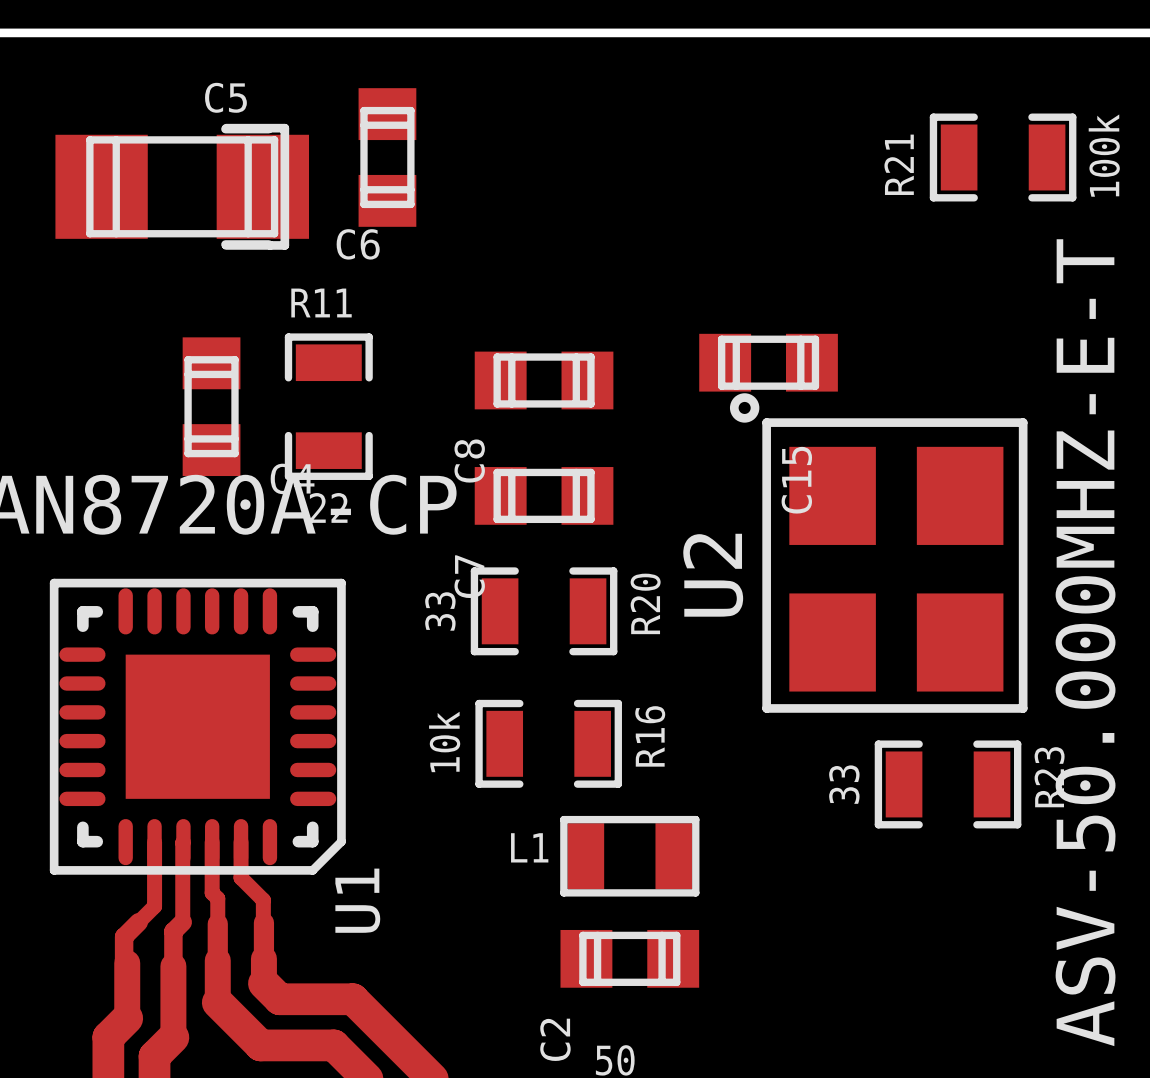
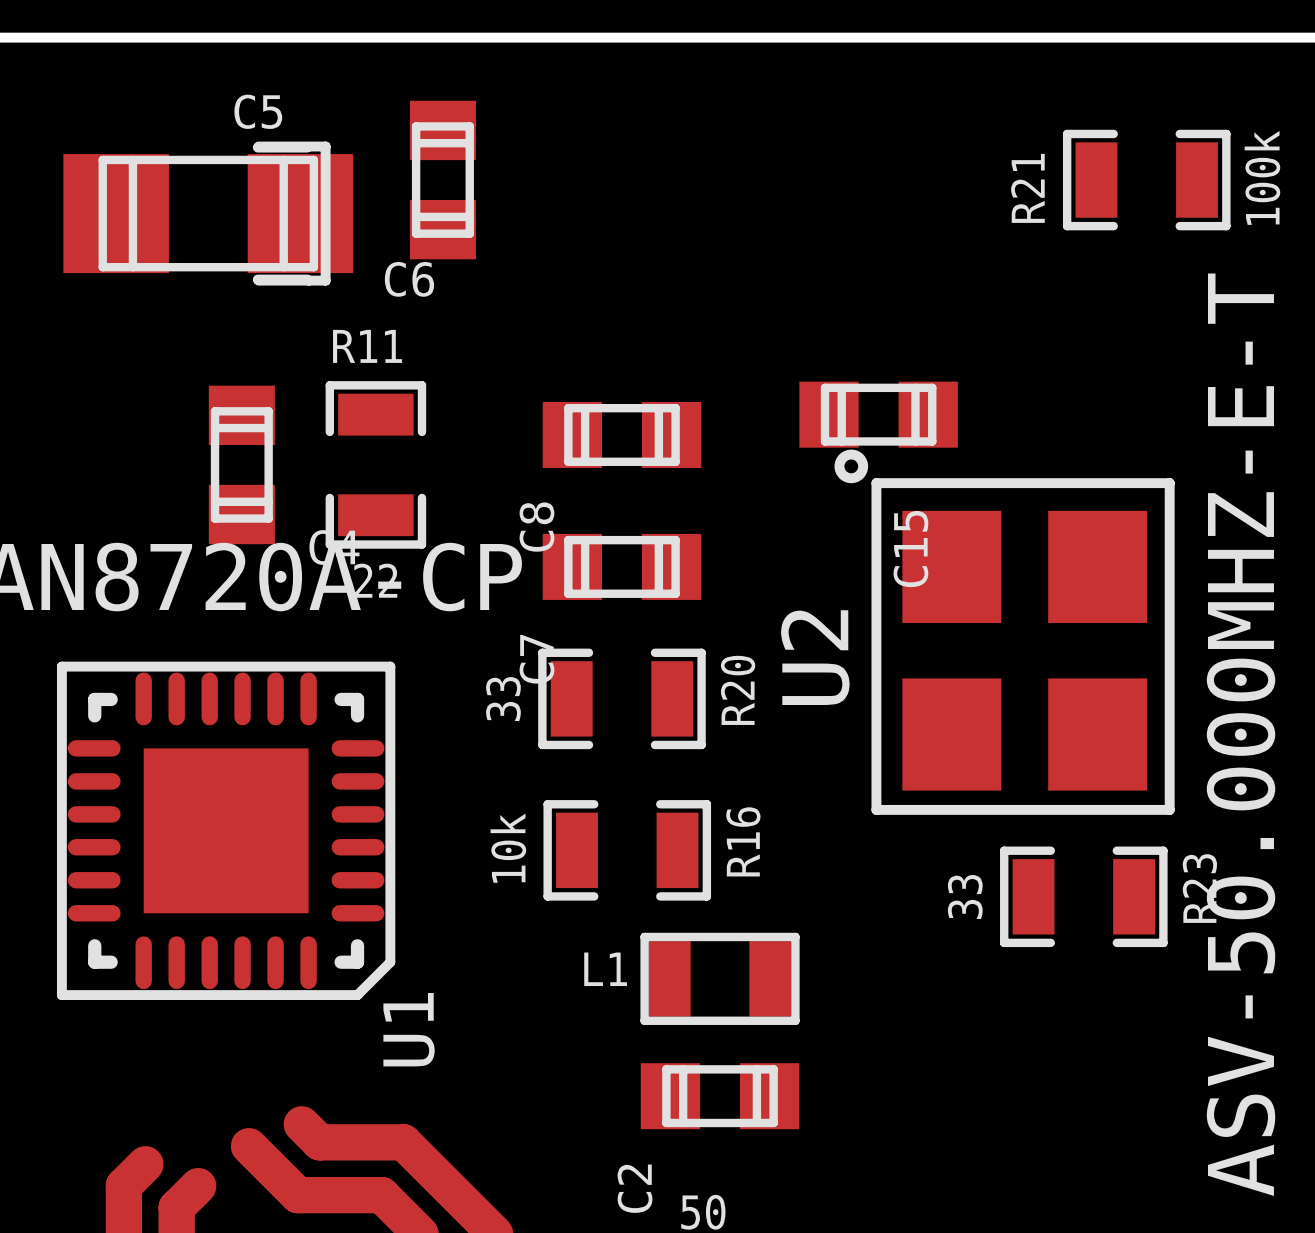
top track: (154, 842) (154, 906) (124, 936) (124, 959) (127, 963) (127, 1018) -> none
top track: (182, 842) (182, 922) (173, 931) (173, 1037) -> none
top track: (212, 842) (212, 893) (217, 898) (217, 1002) -> none
top track: (241, 842) (241, 877) (263, 900) (263, 922) -> none
top track: (263, 922) (263, 983) -> none

